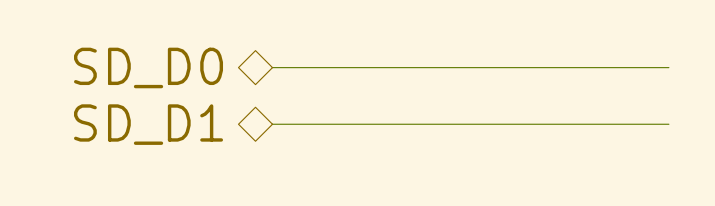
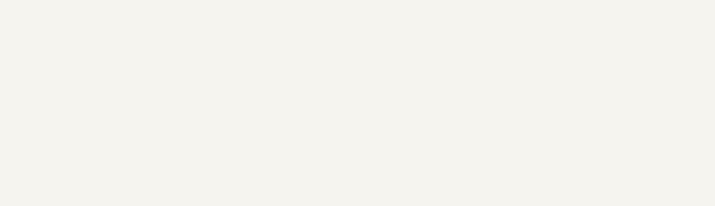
hierarchical label: SD_D0 (148, 67) -> none
wire: (272, 67) (668, 67) -> none
hierarchical label: SD_D1 (148, 124) -> none
wire: (272, 124) (668, 124) -> none

